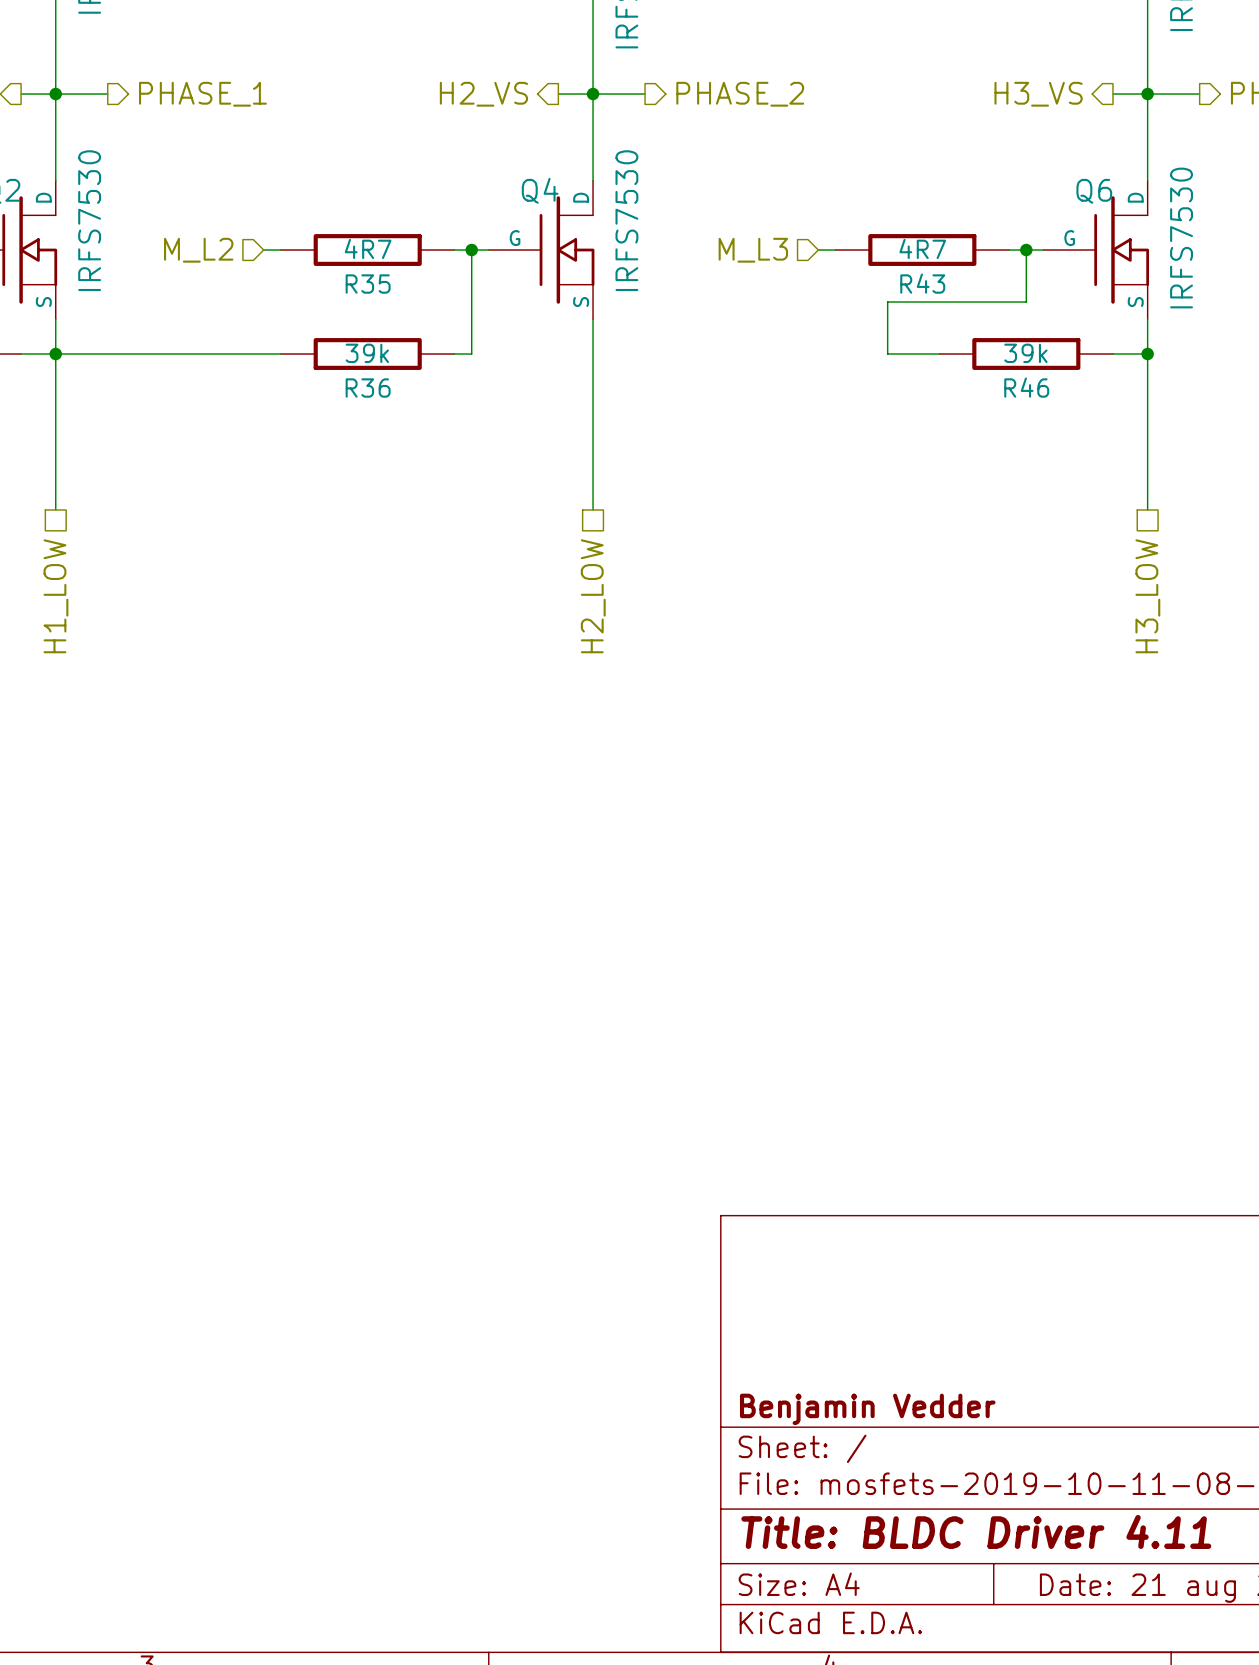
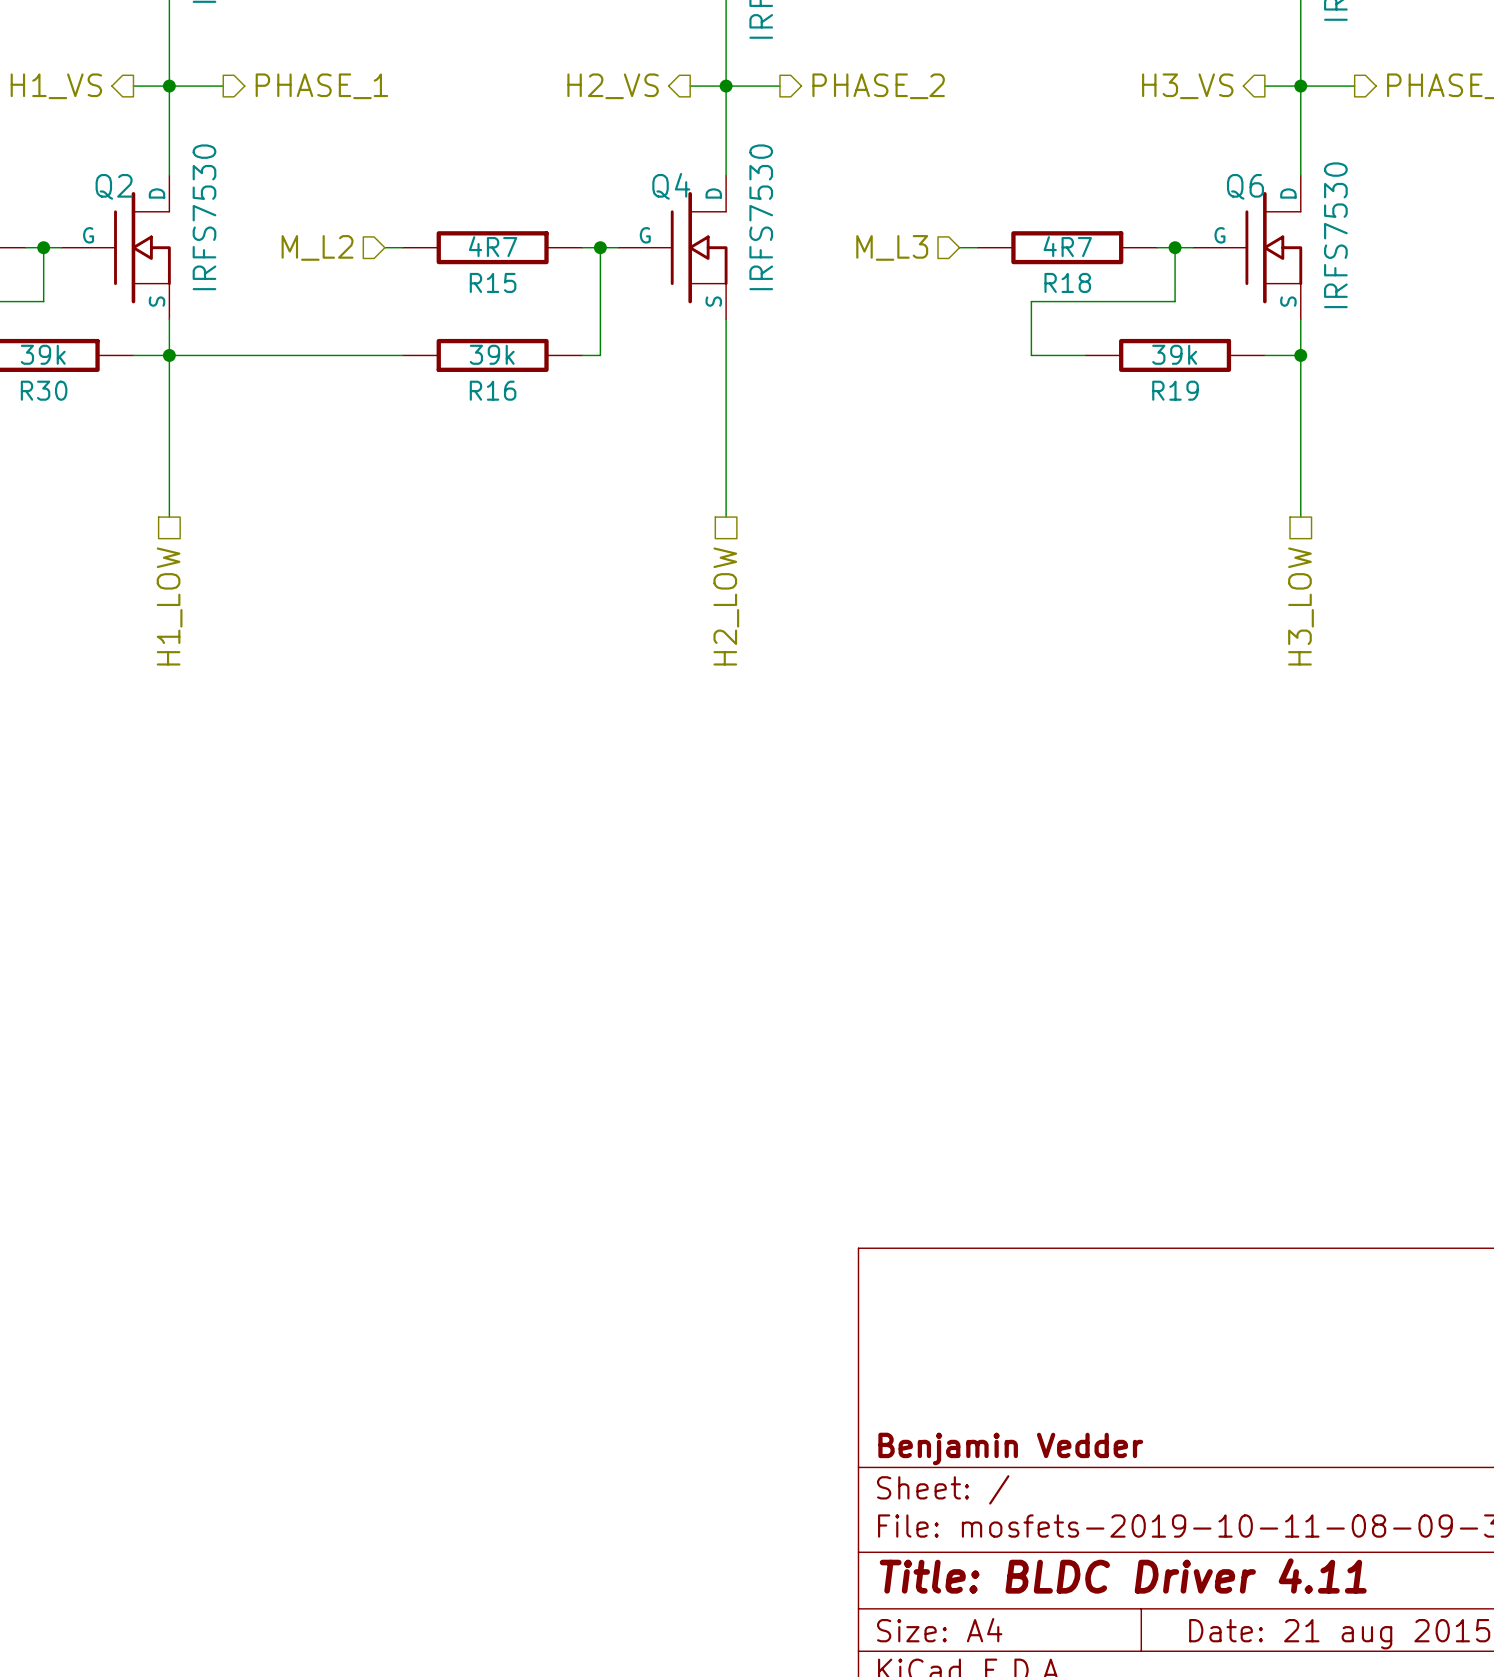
R43 name: R43 (922, 283) -> R18 (1067, 282)
R35 name: R35 (368, 284) -> R15 (493, 282)
R46 name: R46 (1026, 387) -> R19 (1175, 390)
R36 name: R36 (368, 388) -> R16 (493, 390)

